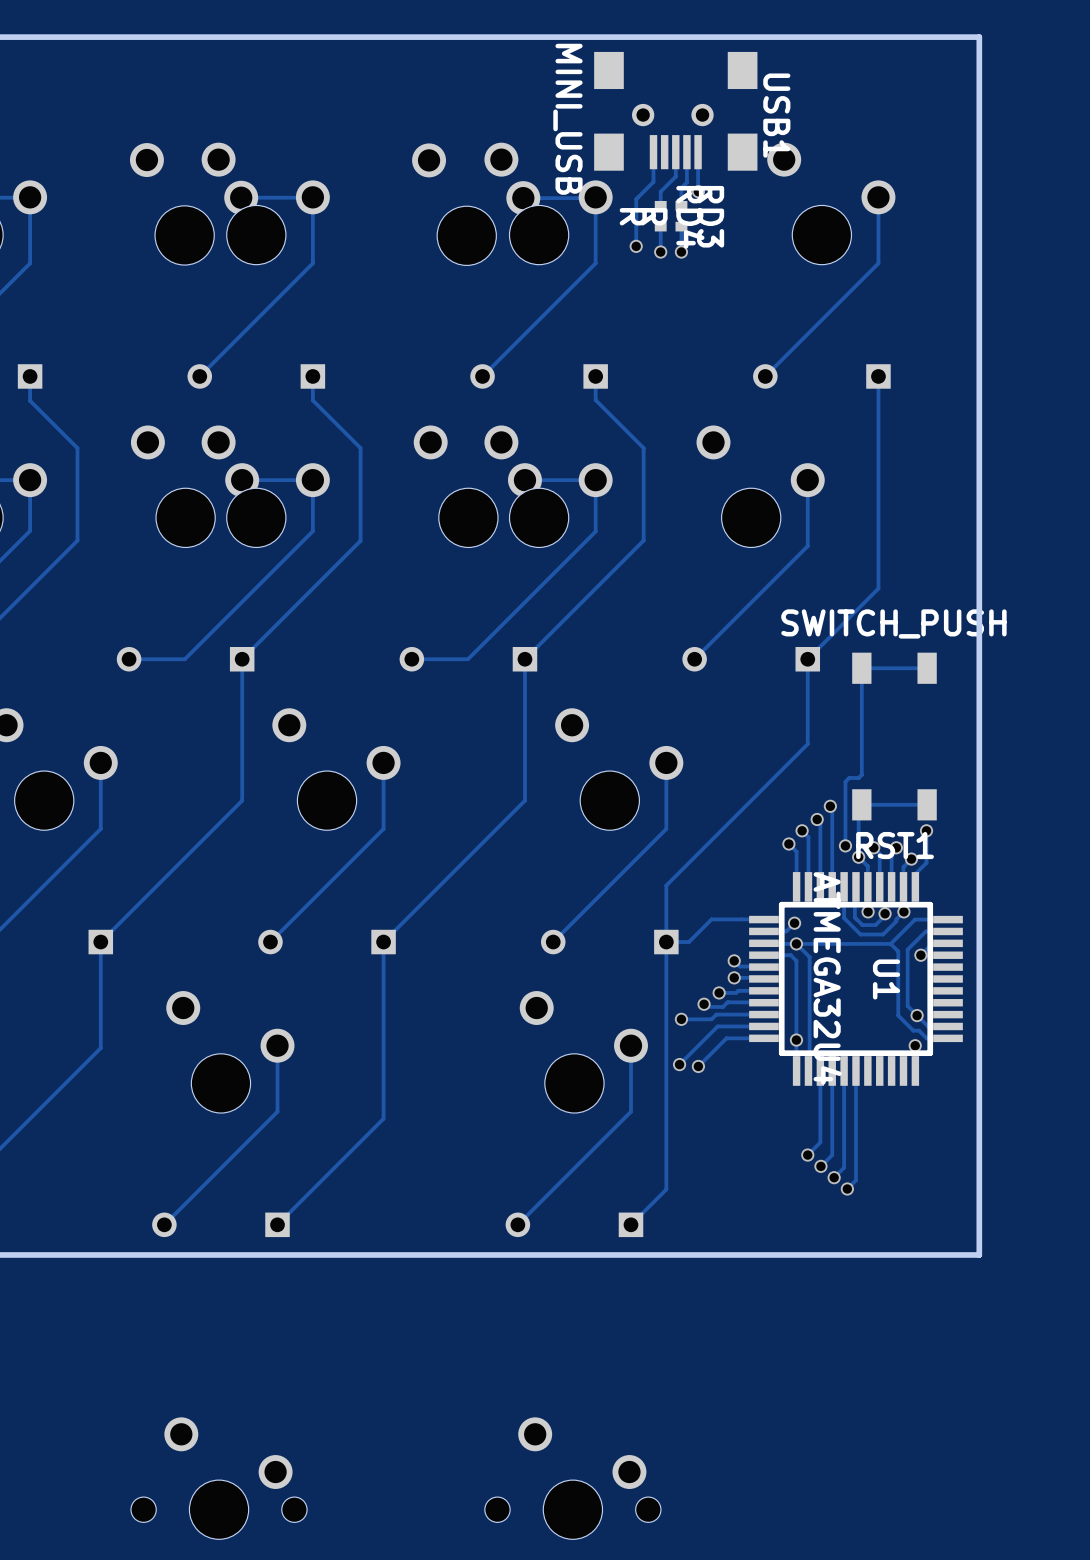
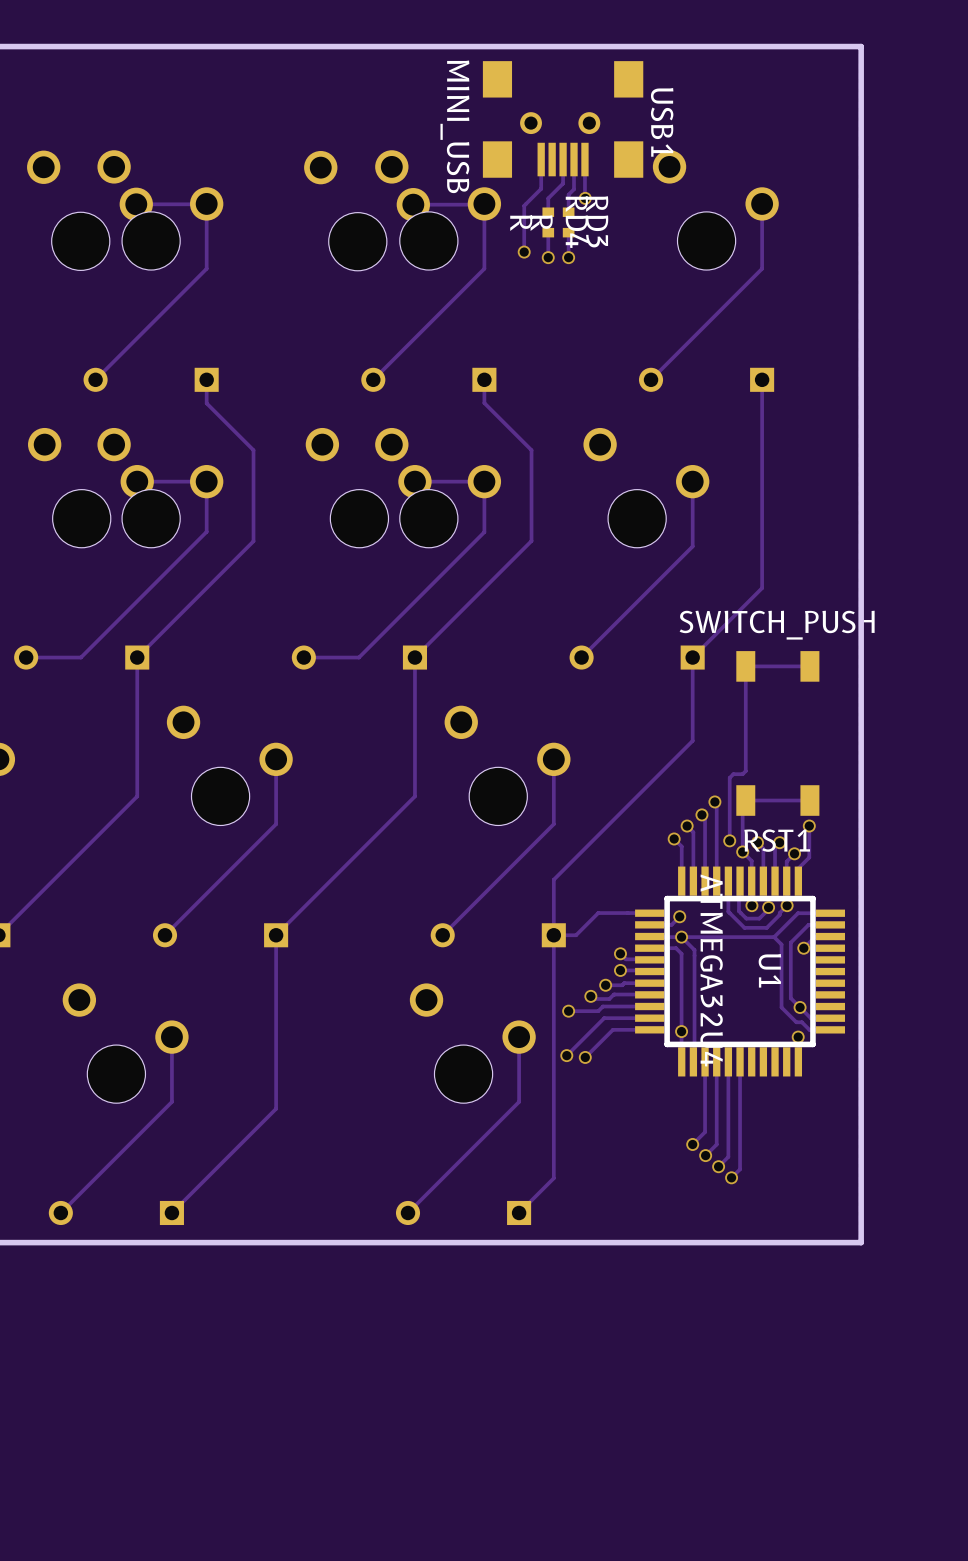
part: (219, 1478) -> none
part: (572, 1478) -> none

